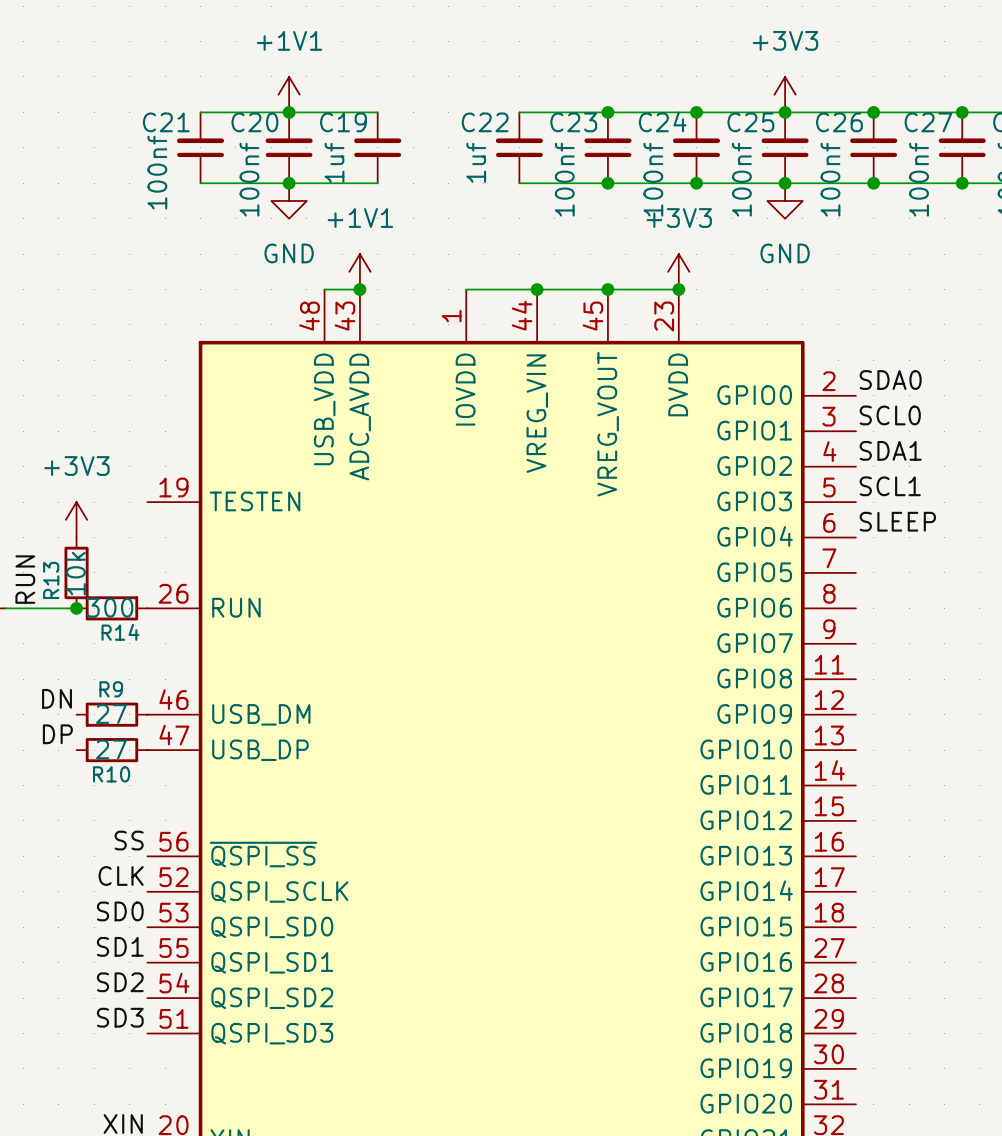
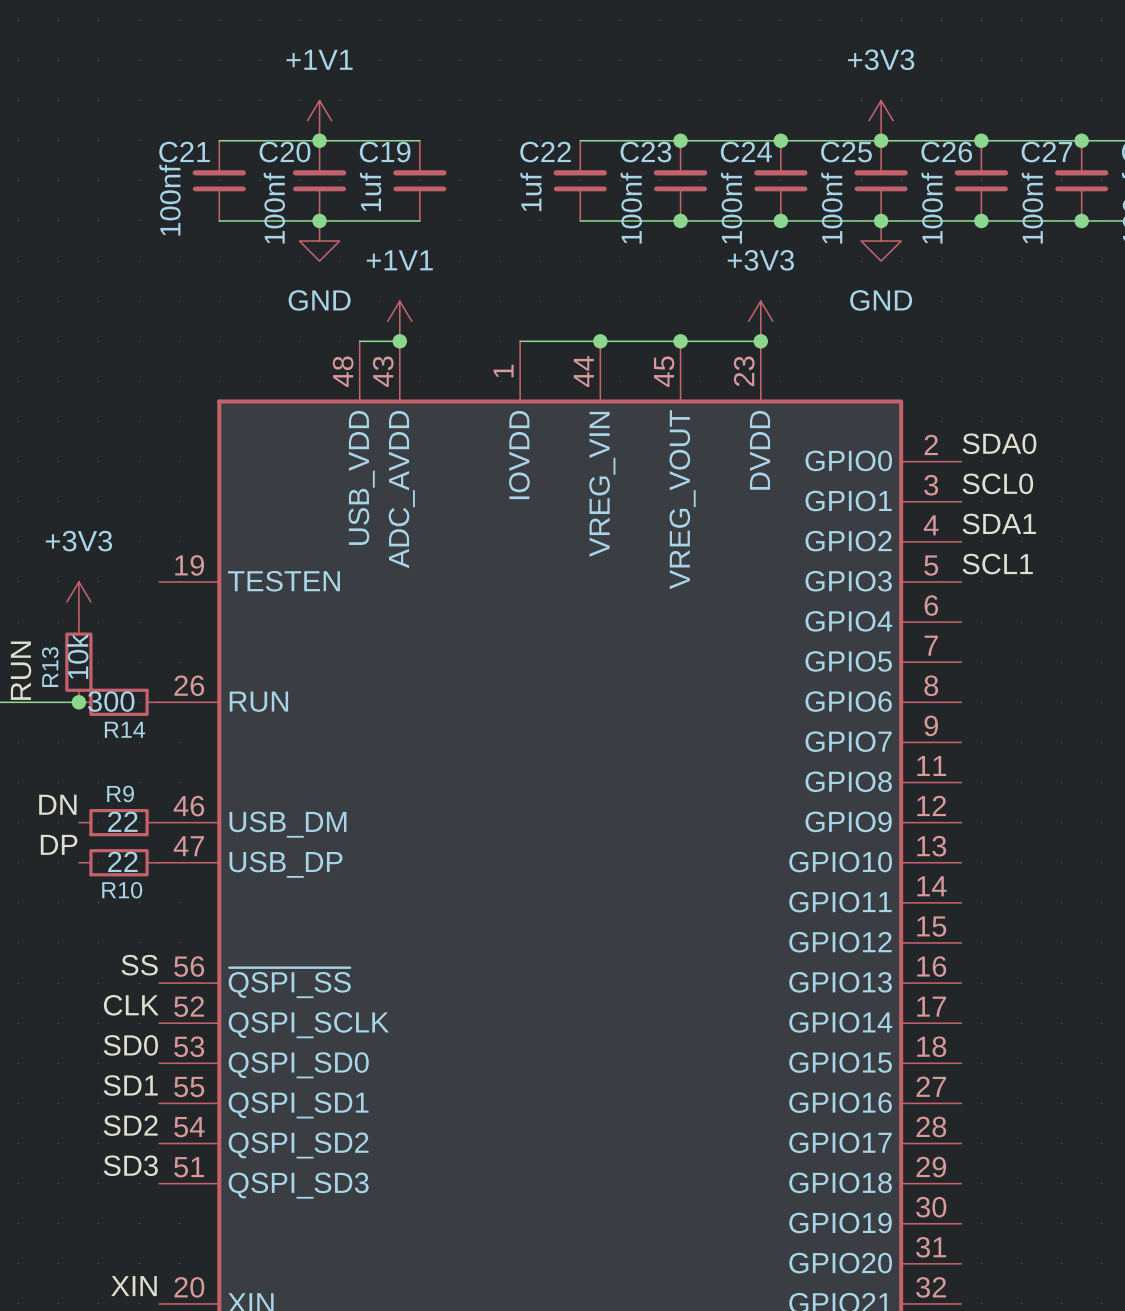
label: SLEEP (897, 521) -> none
R9 value: 27 (111, 714) -> 22 (122, 821)
R10 value: 27 (111, 749) -> 22 (122, 861)

